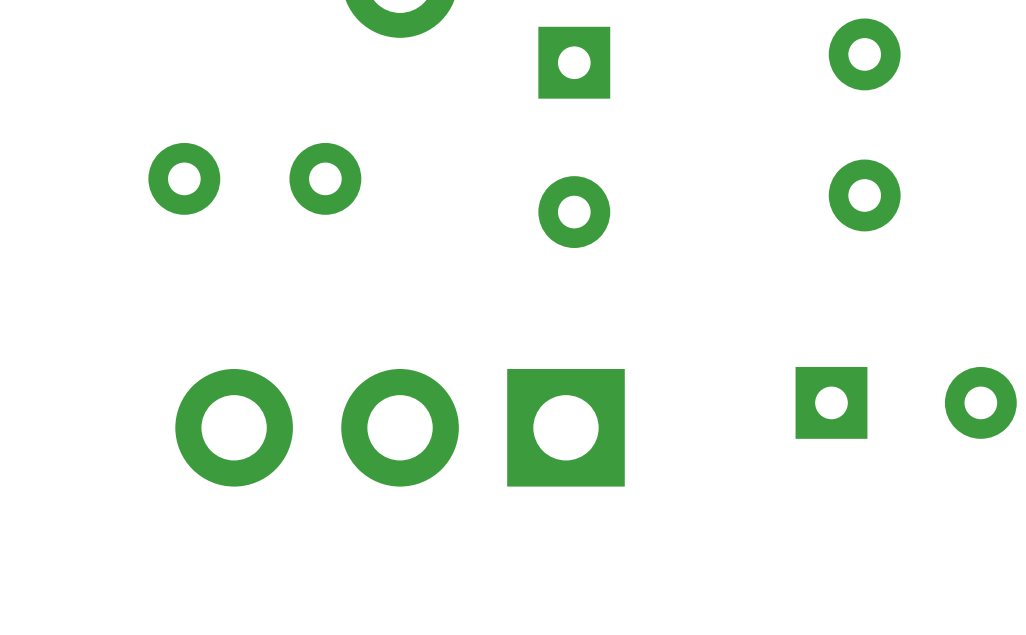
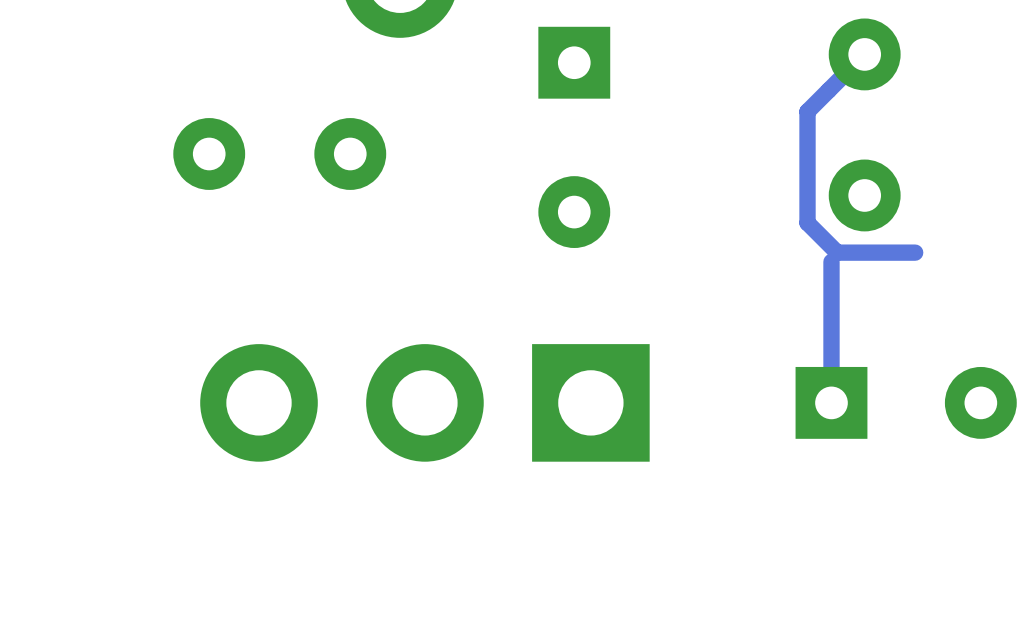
bottom track: none -> (864, 54) (807, 111) (807, 222) (837, 252) (915, 252)
part position: (254, 178) -> (279, 153)
bottom track: none -> (831, 261) (831, 402)
part position: (400, 427) -> (424, 402)

